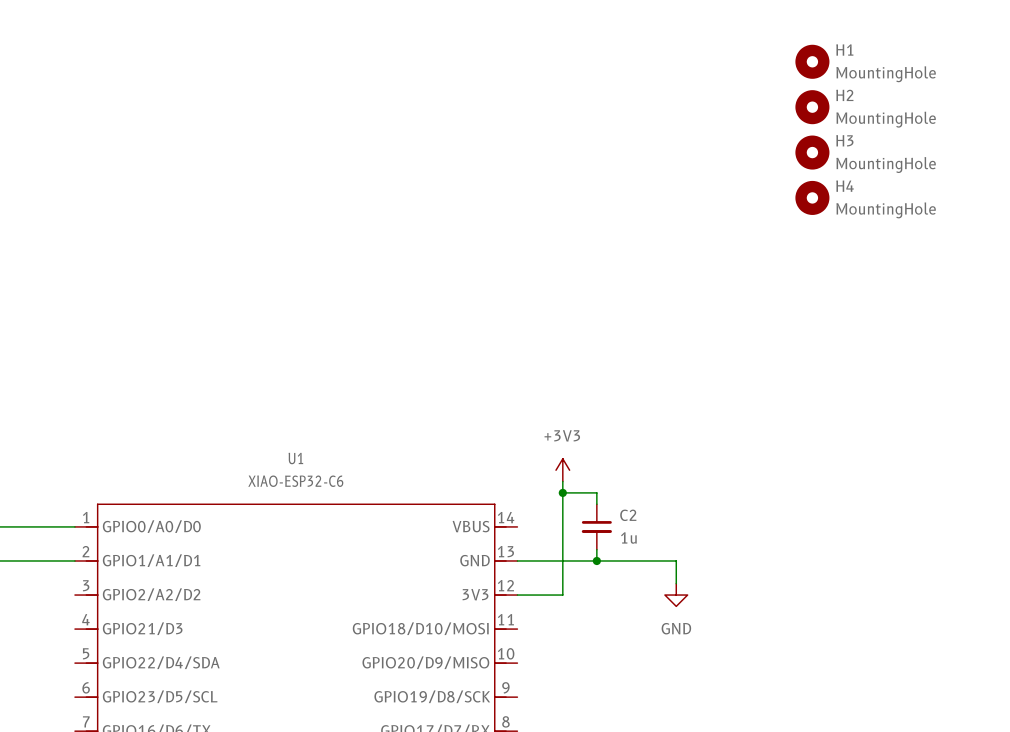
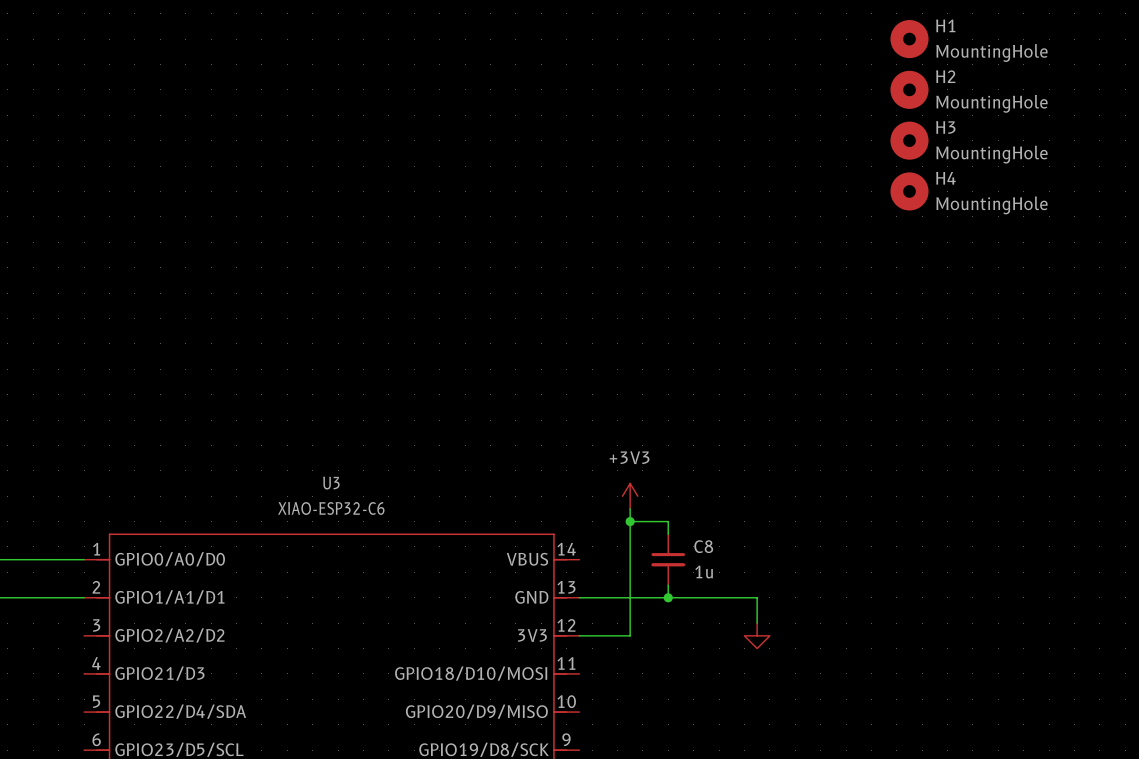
U1 name: U1 (295, 458) -> U3 (331, 483)
C2 name: C2 (628, 515) -> C8 (703, 546)
power symbol text: GND (676, 628) -> none

